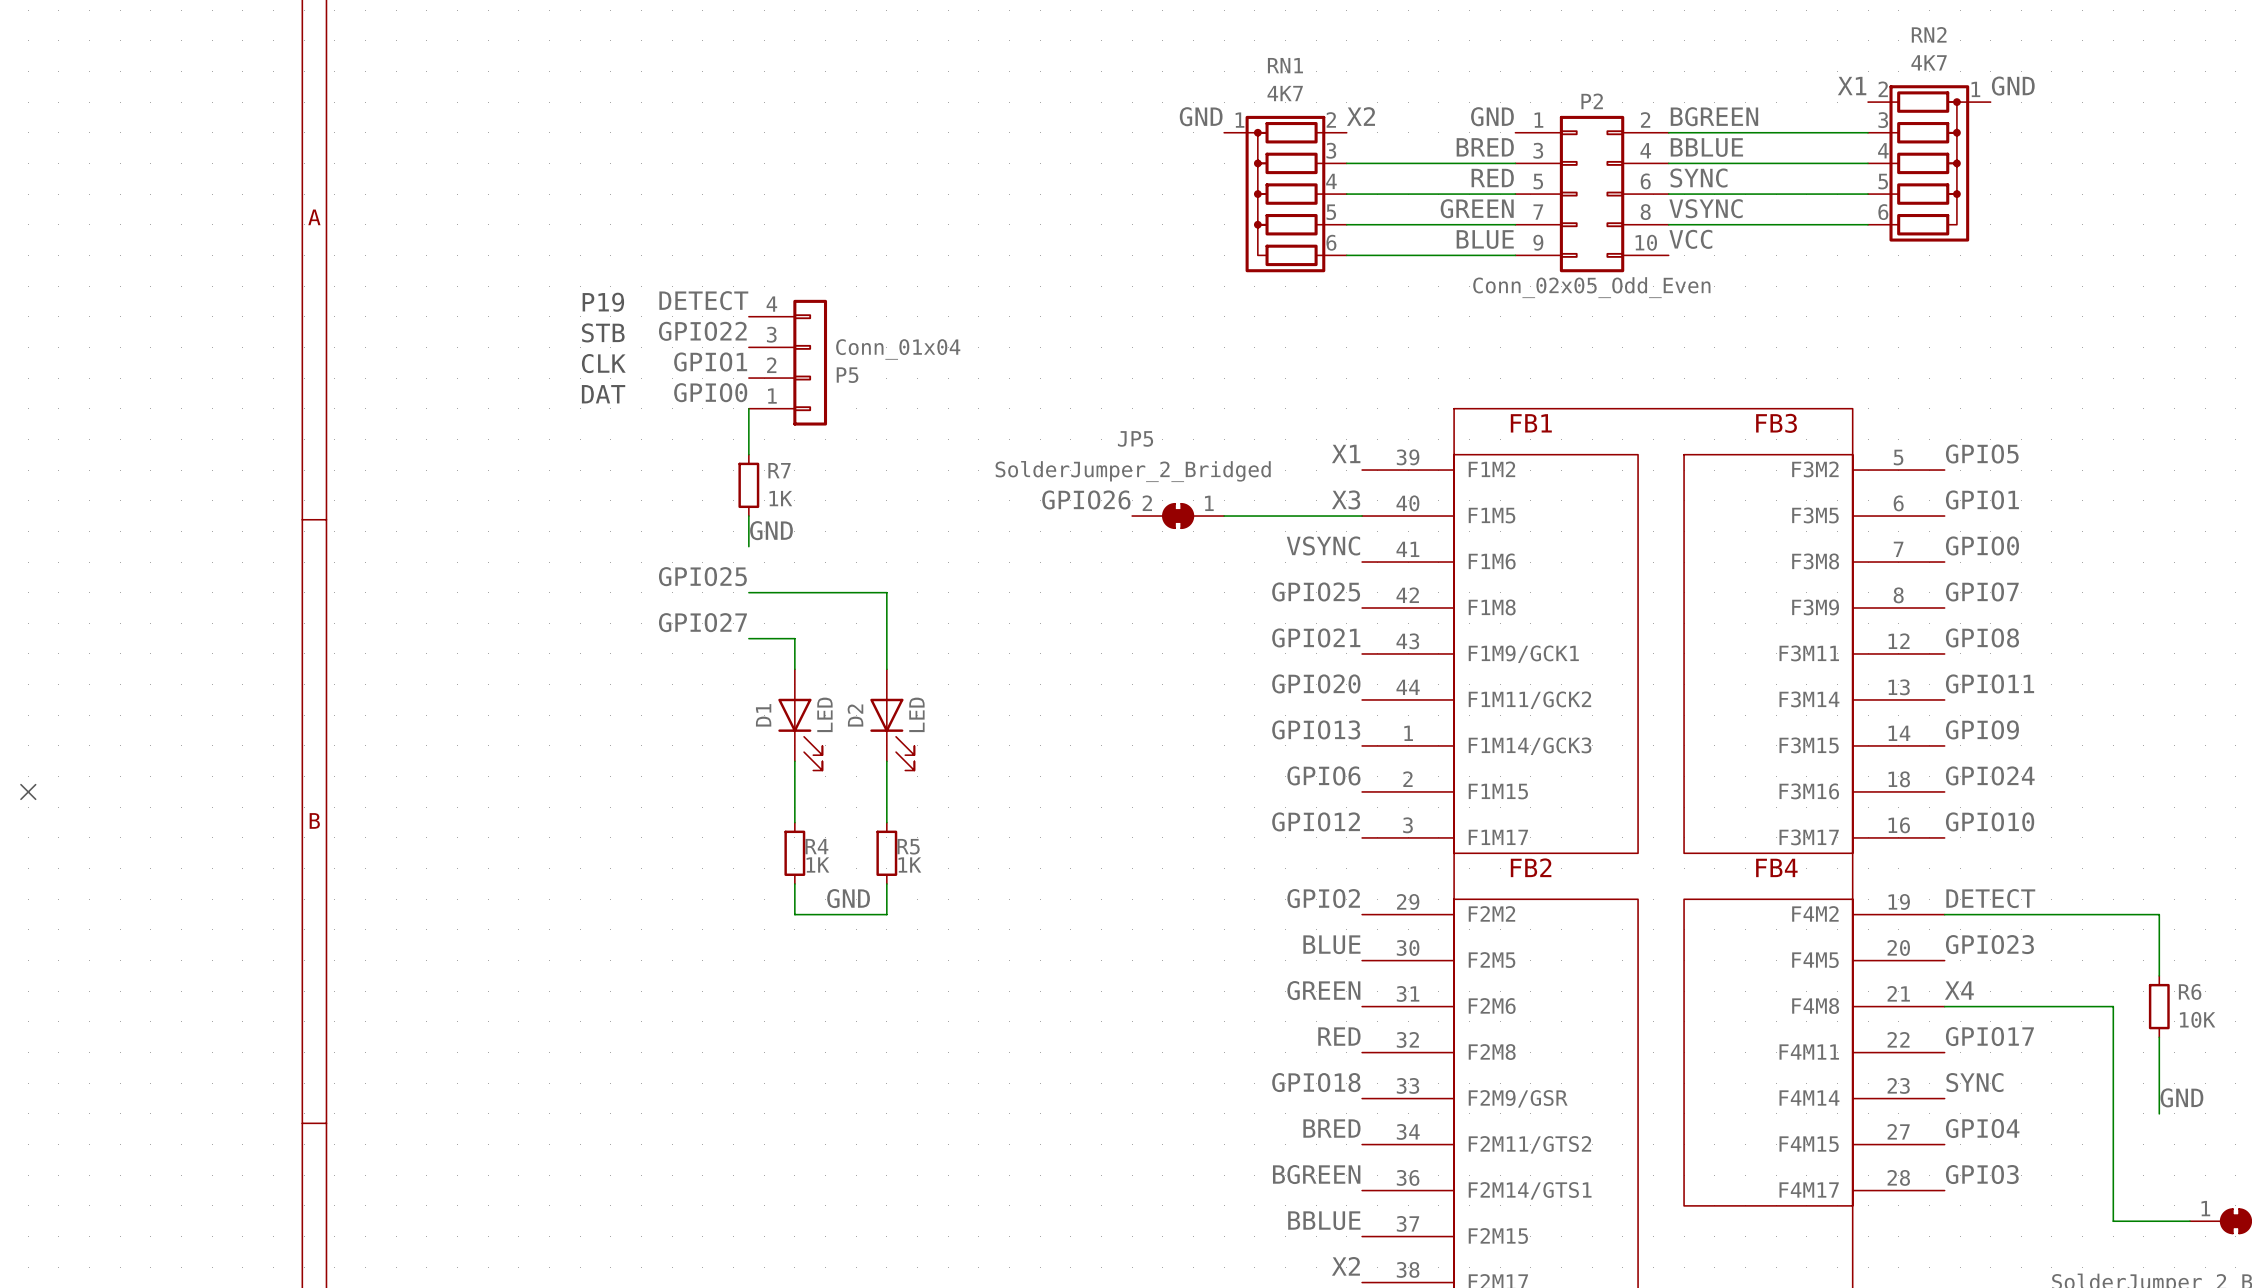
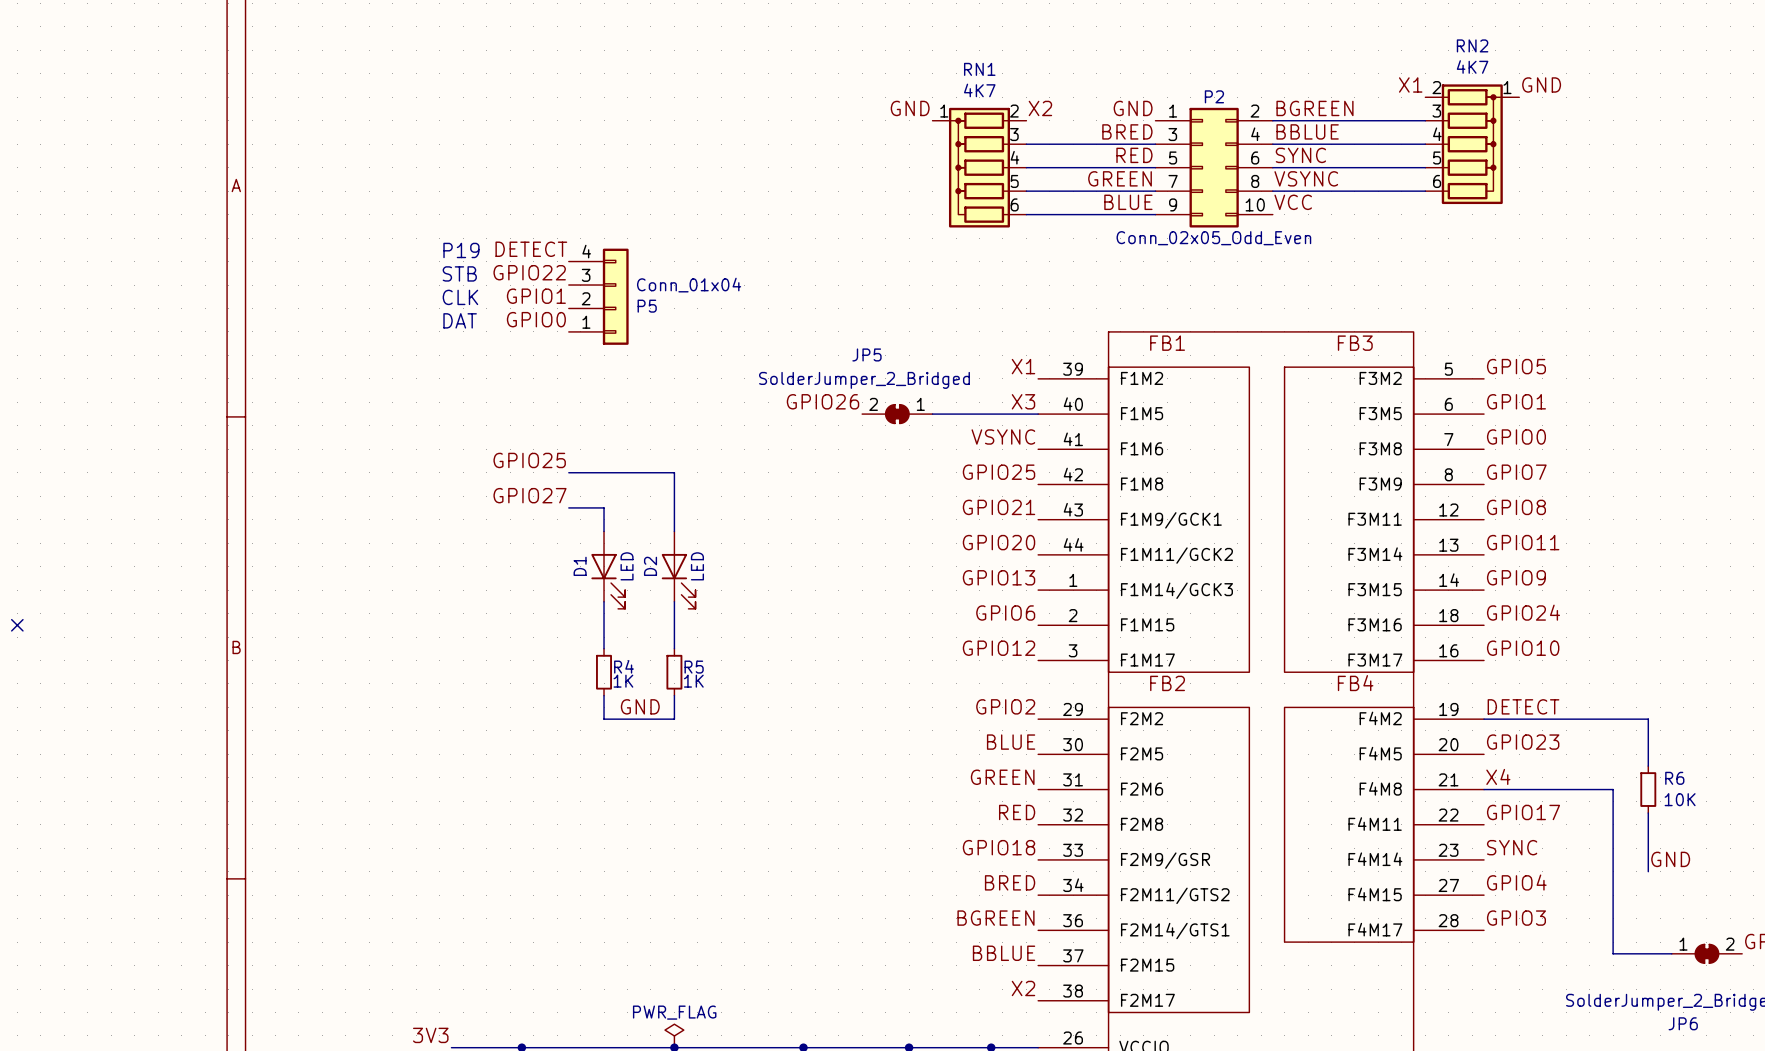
wire: (748, 408) (748, 454) -> none
R7: 1K (748, 485) -> none
wire: (748, 516) (748, 546) -> none
label: GND (771, 530) -> none

